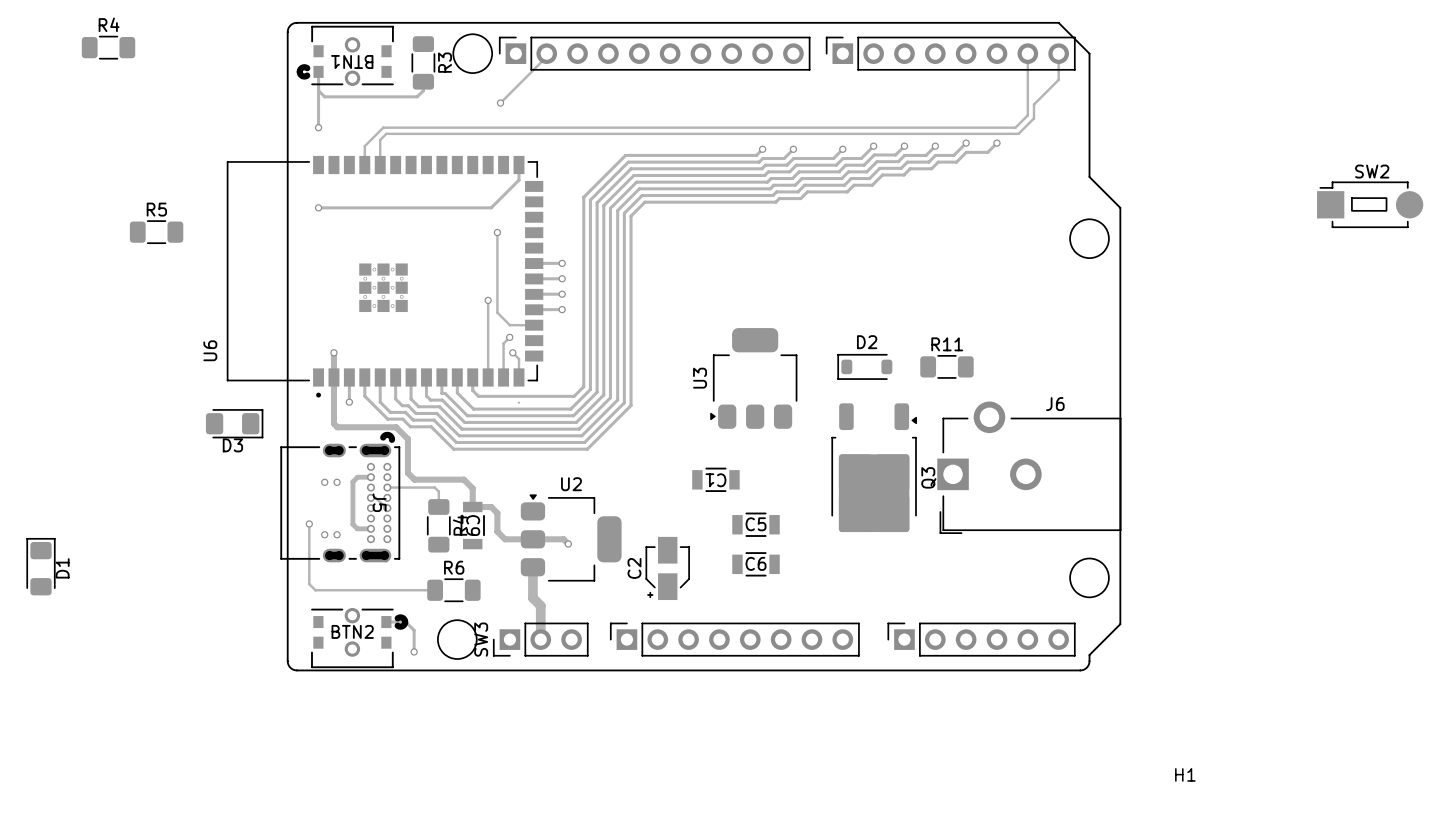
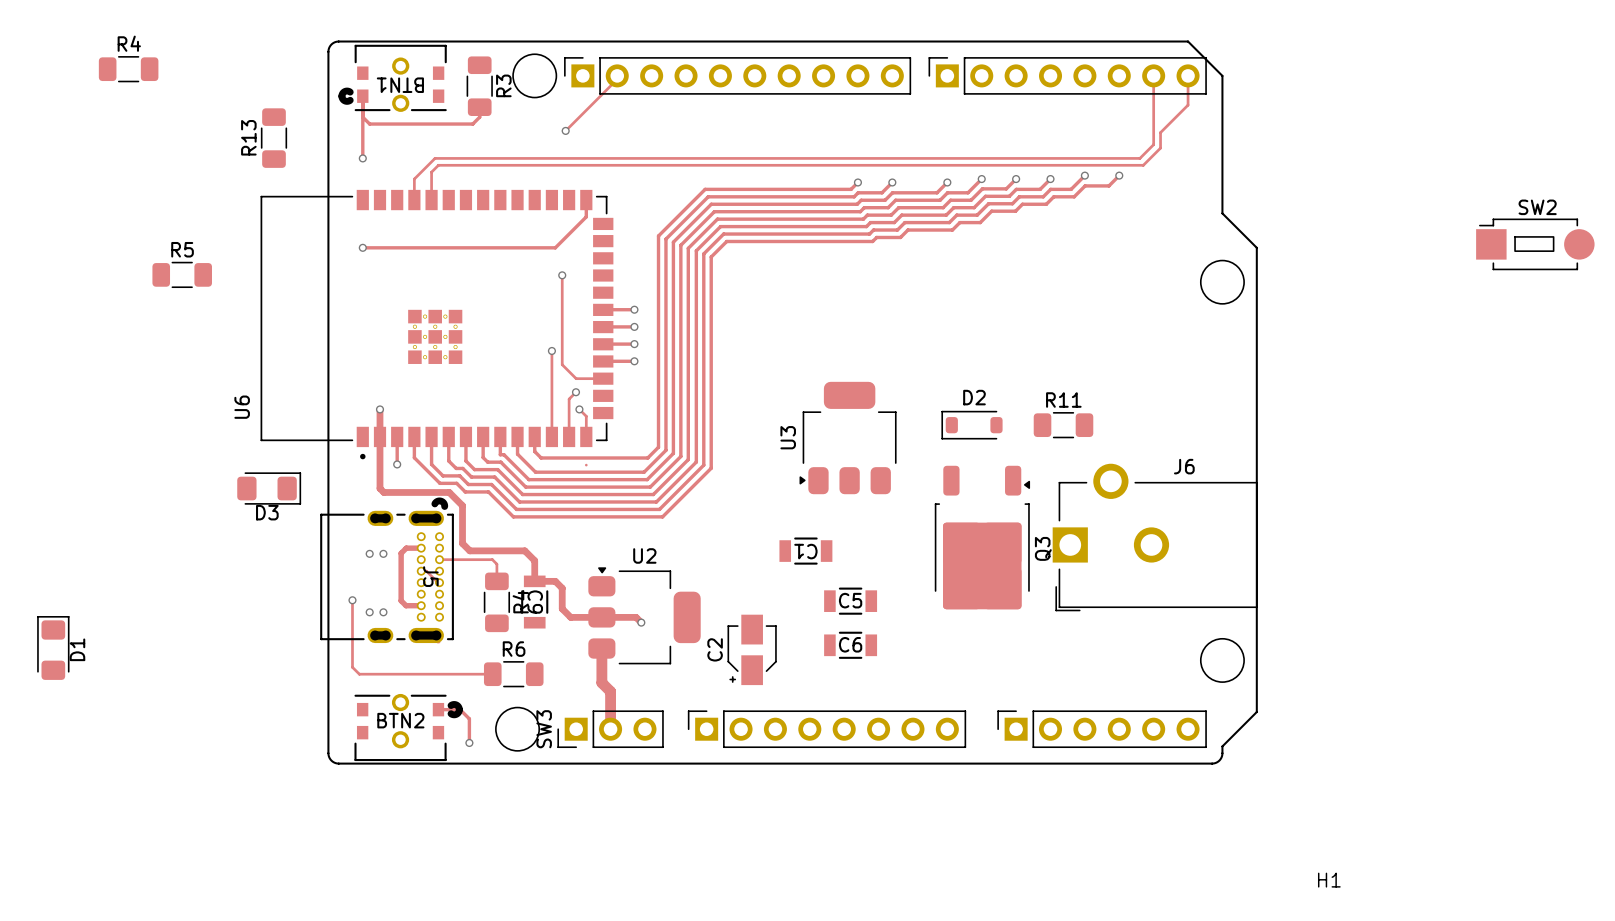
R13: none -> (274, 138)

